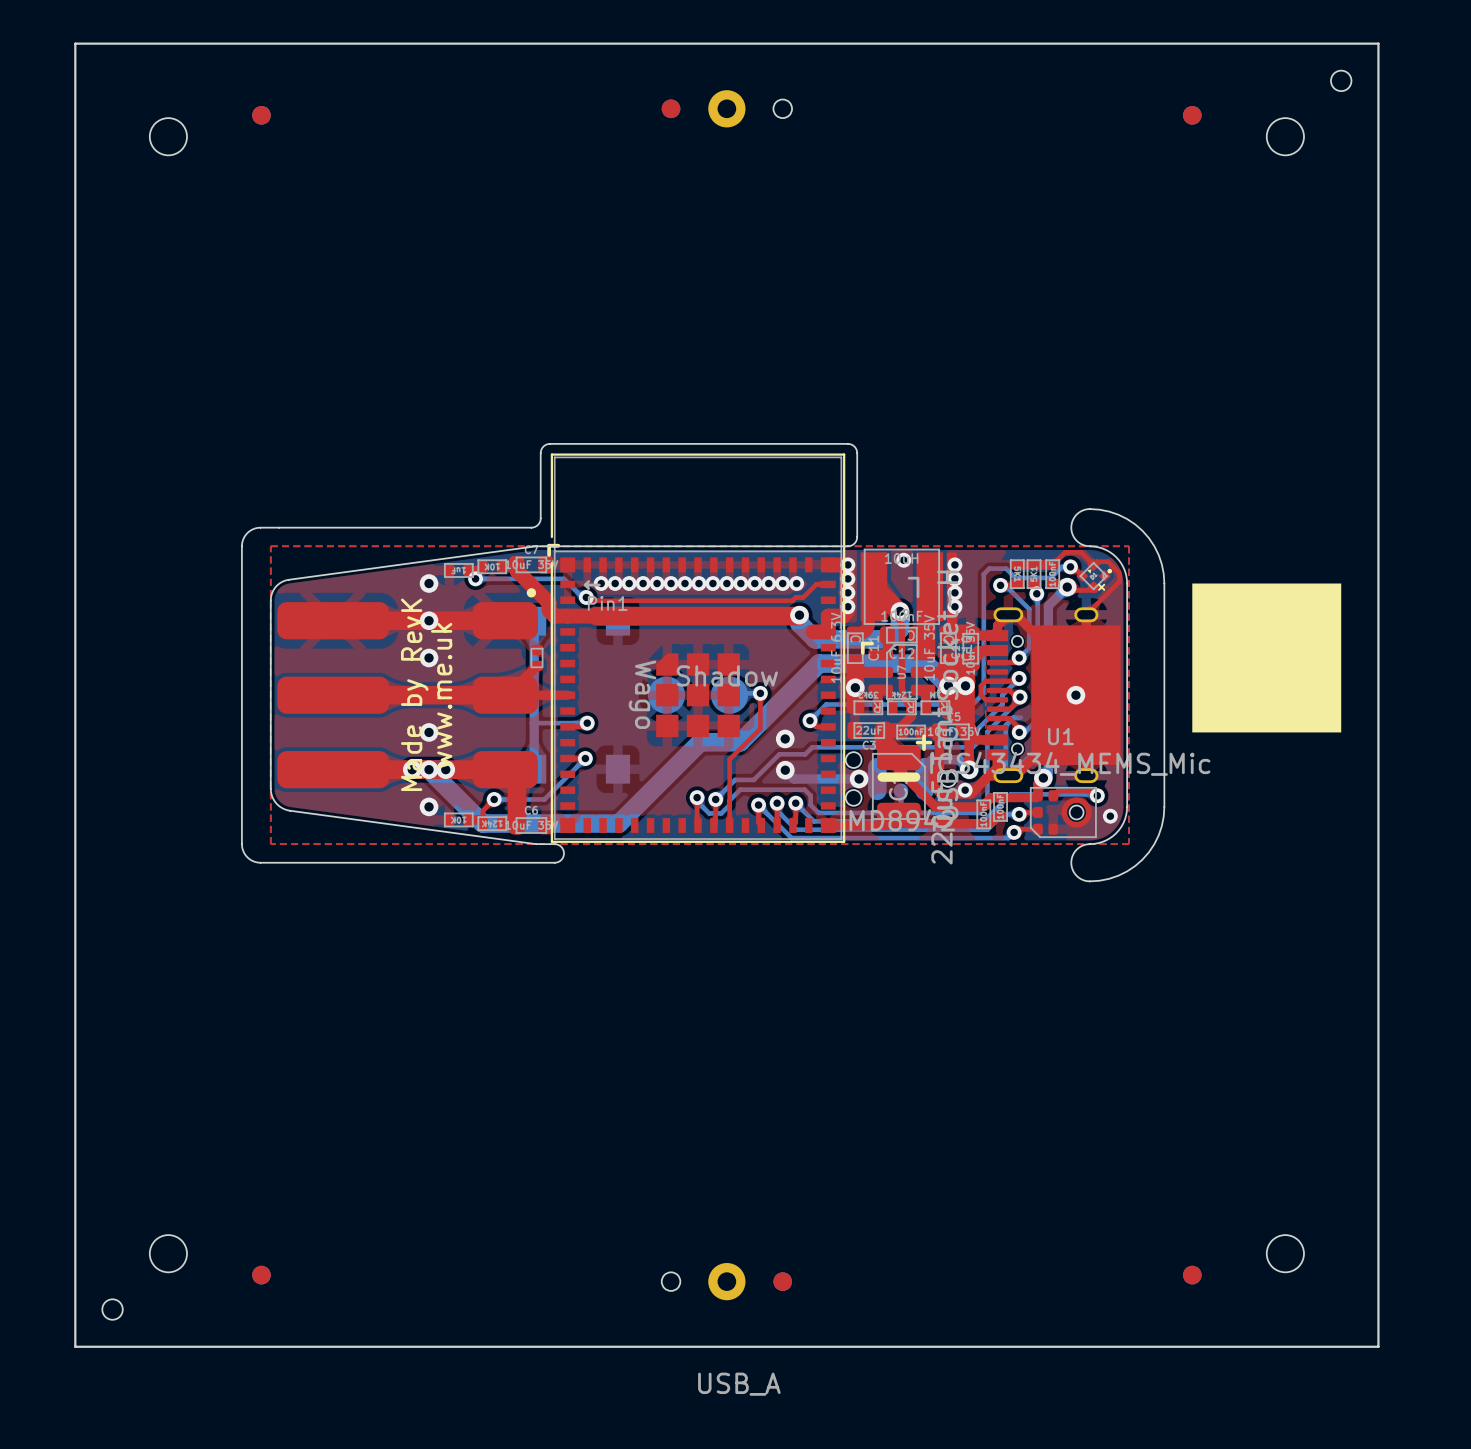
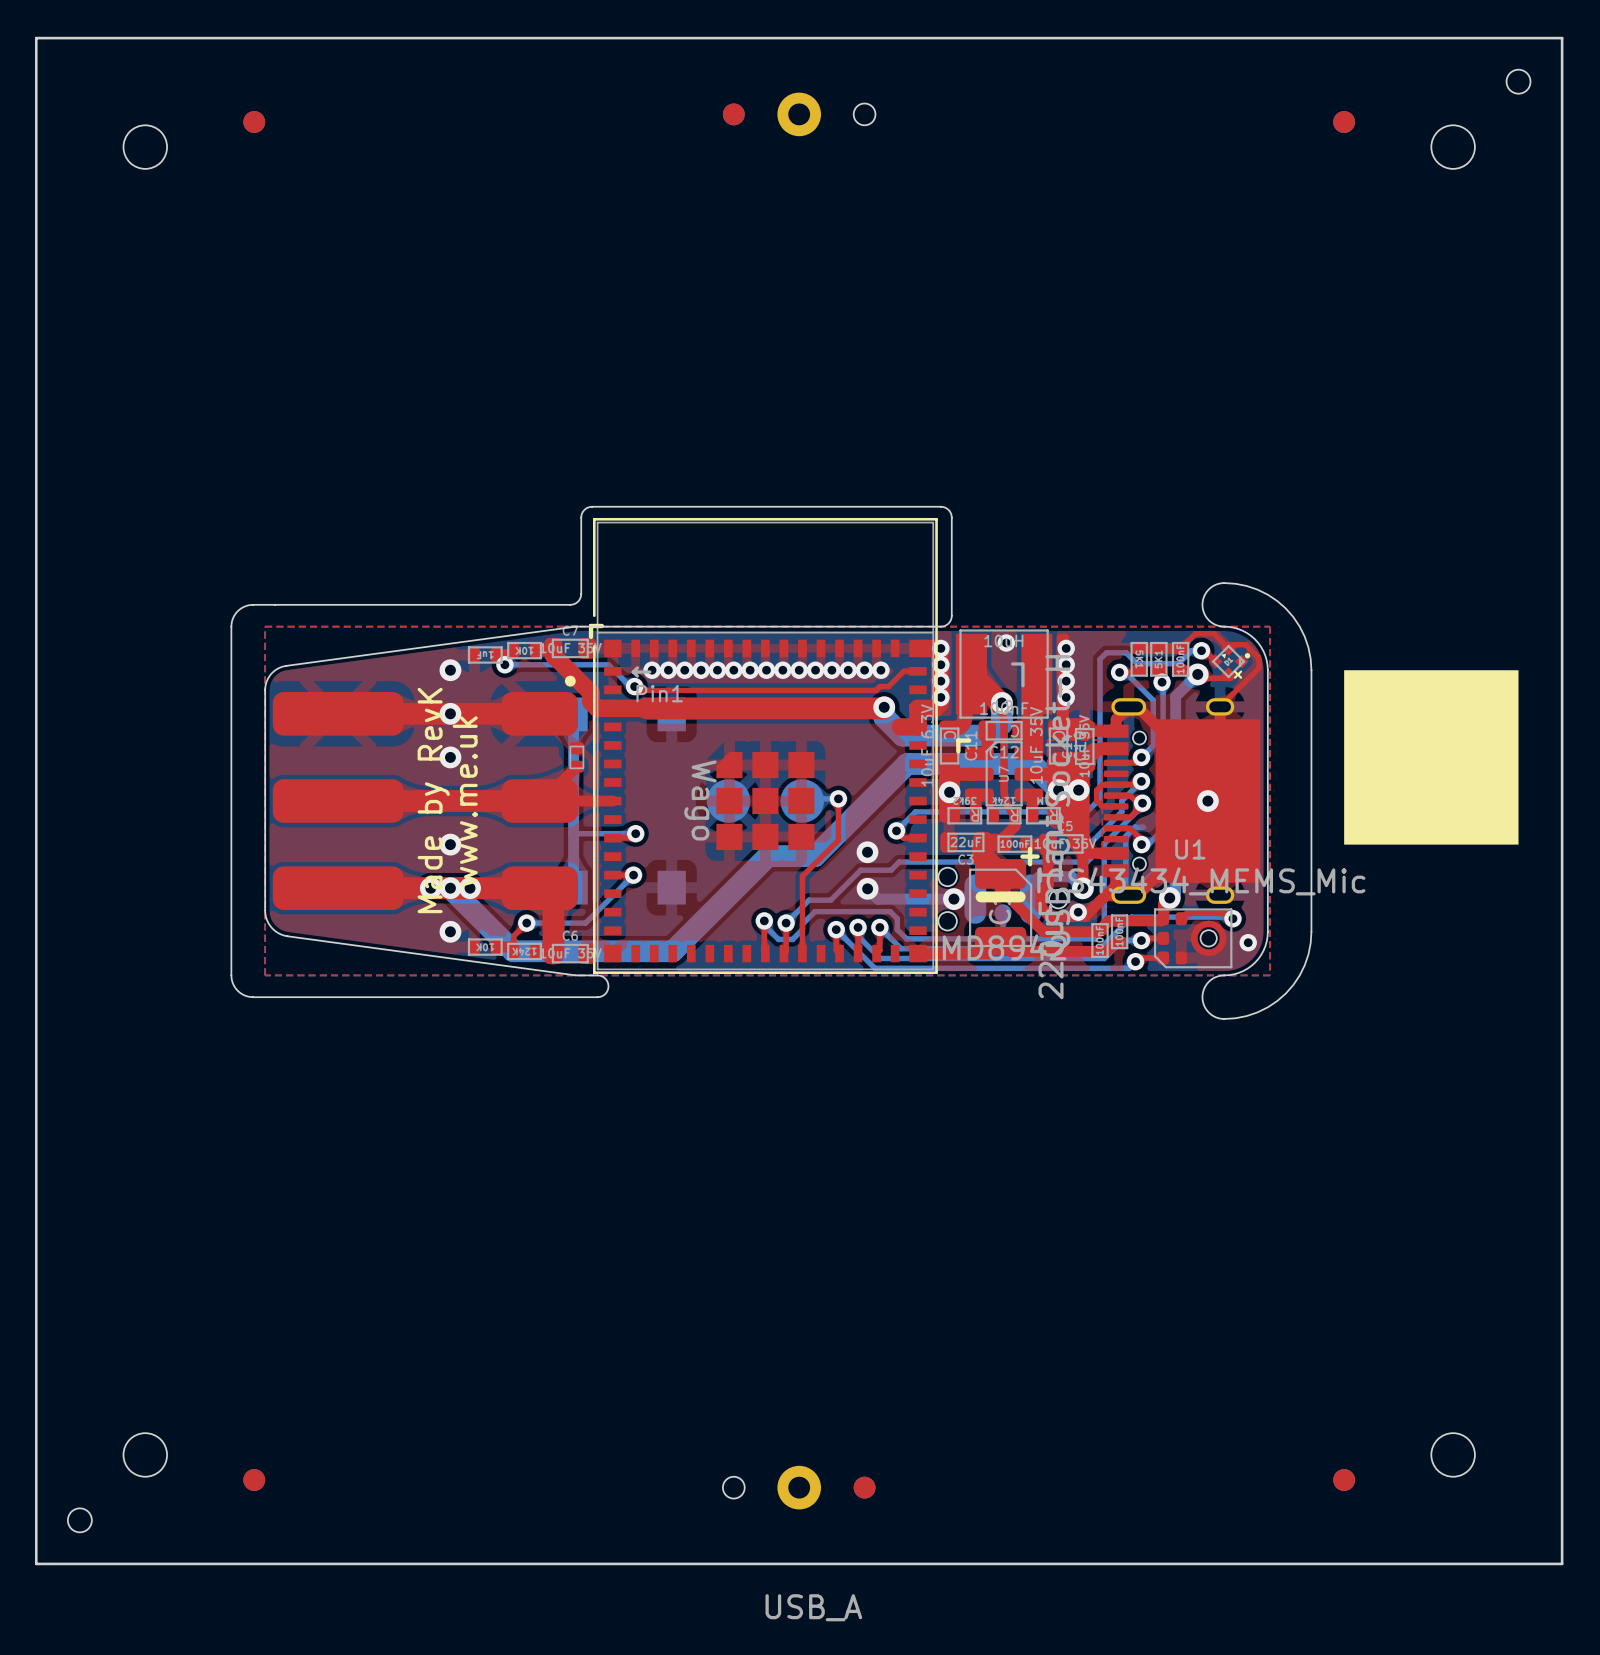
drawing: [676, 665, 778, 687] -> none

